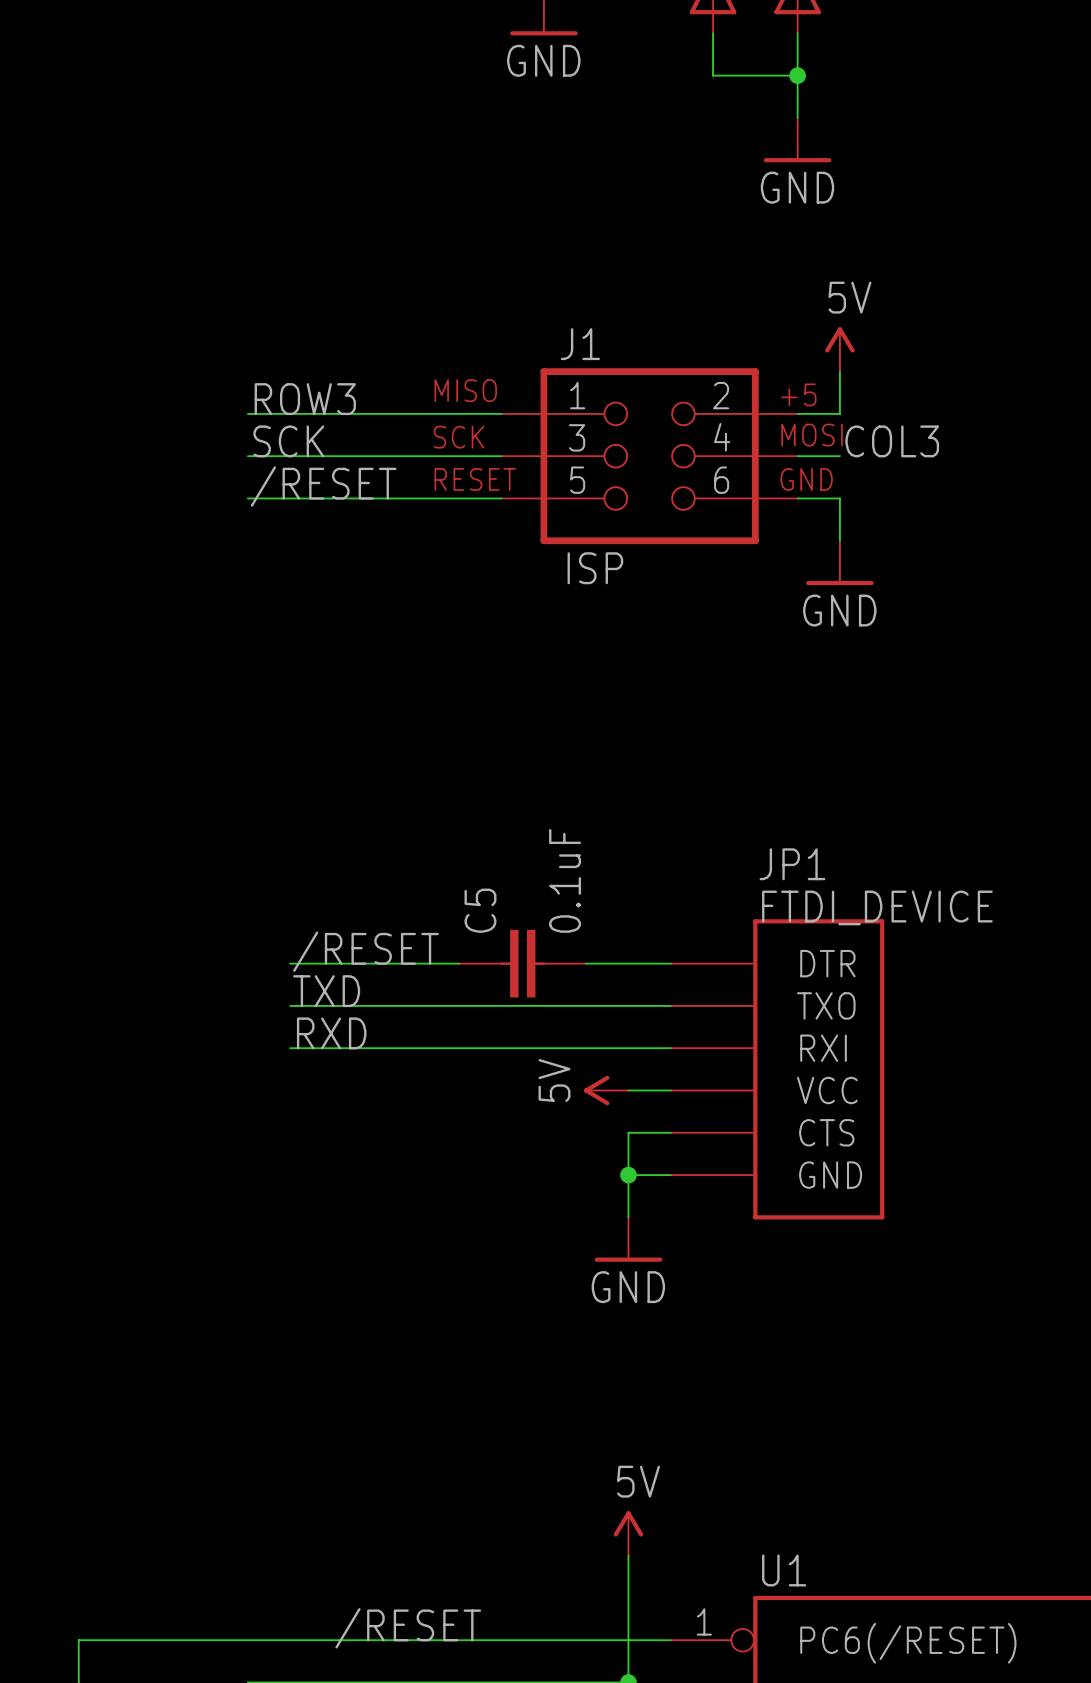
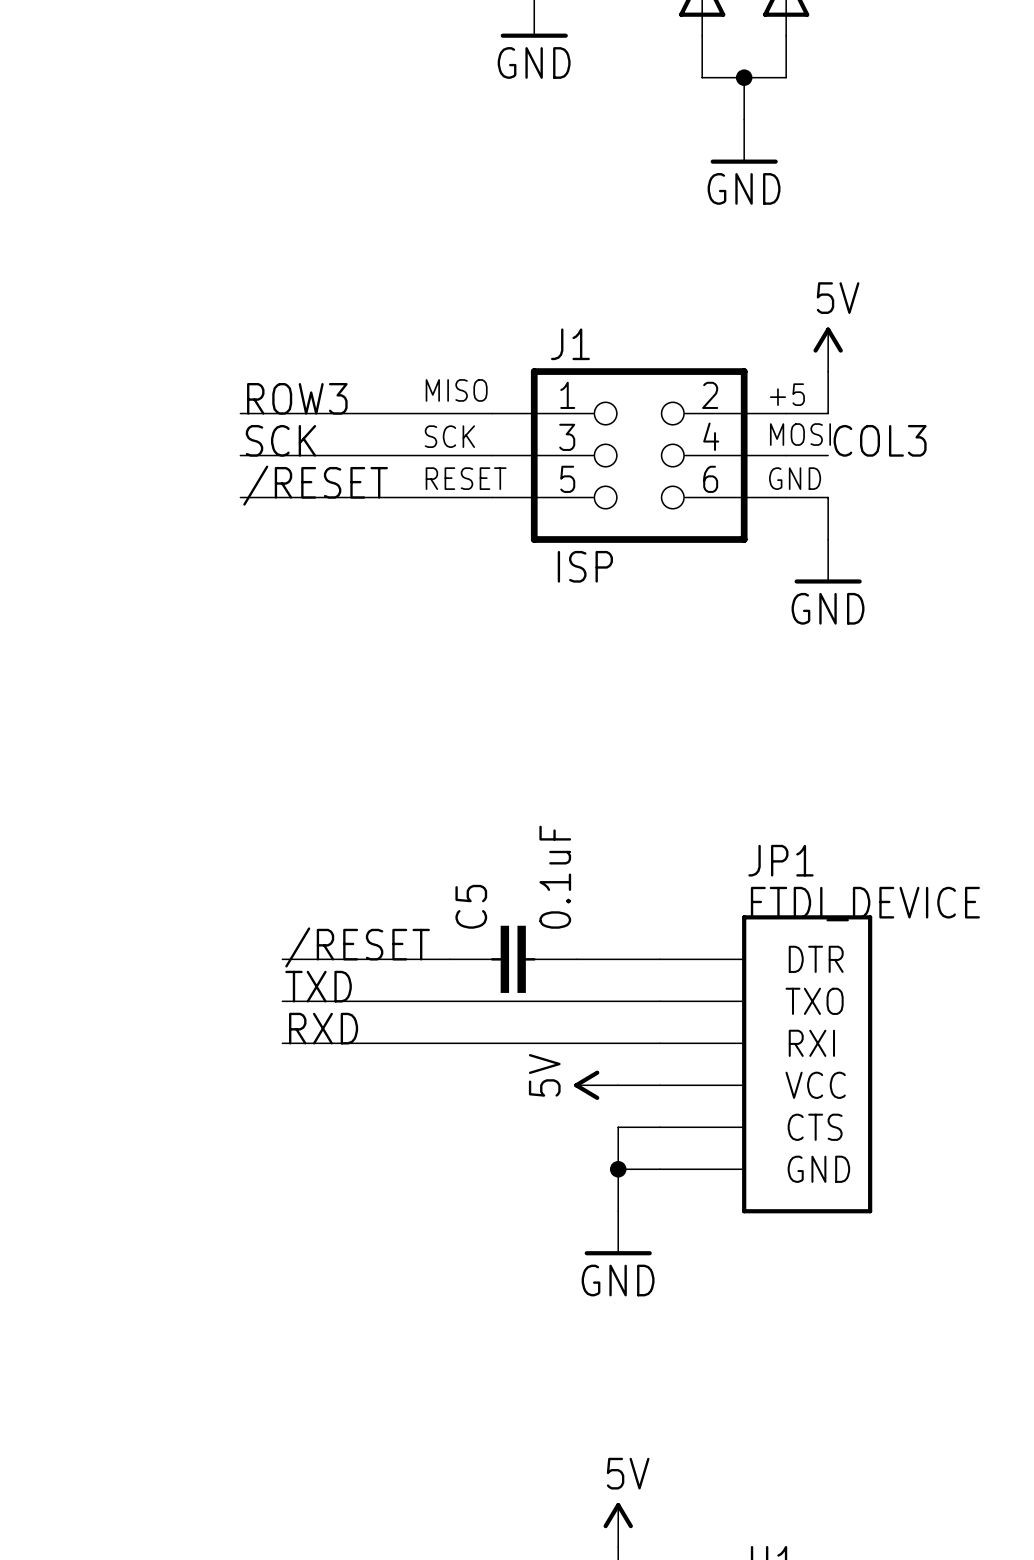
wire: (797, 75) (797, 117) -> (744, 77) (744, 119)
junction position: (797, 75) -> (744, 77)
power symbol position: GND (797, 140) -> GND (744, 141)

